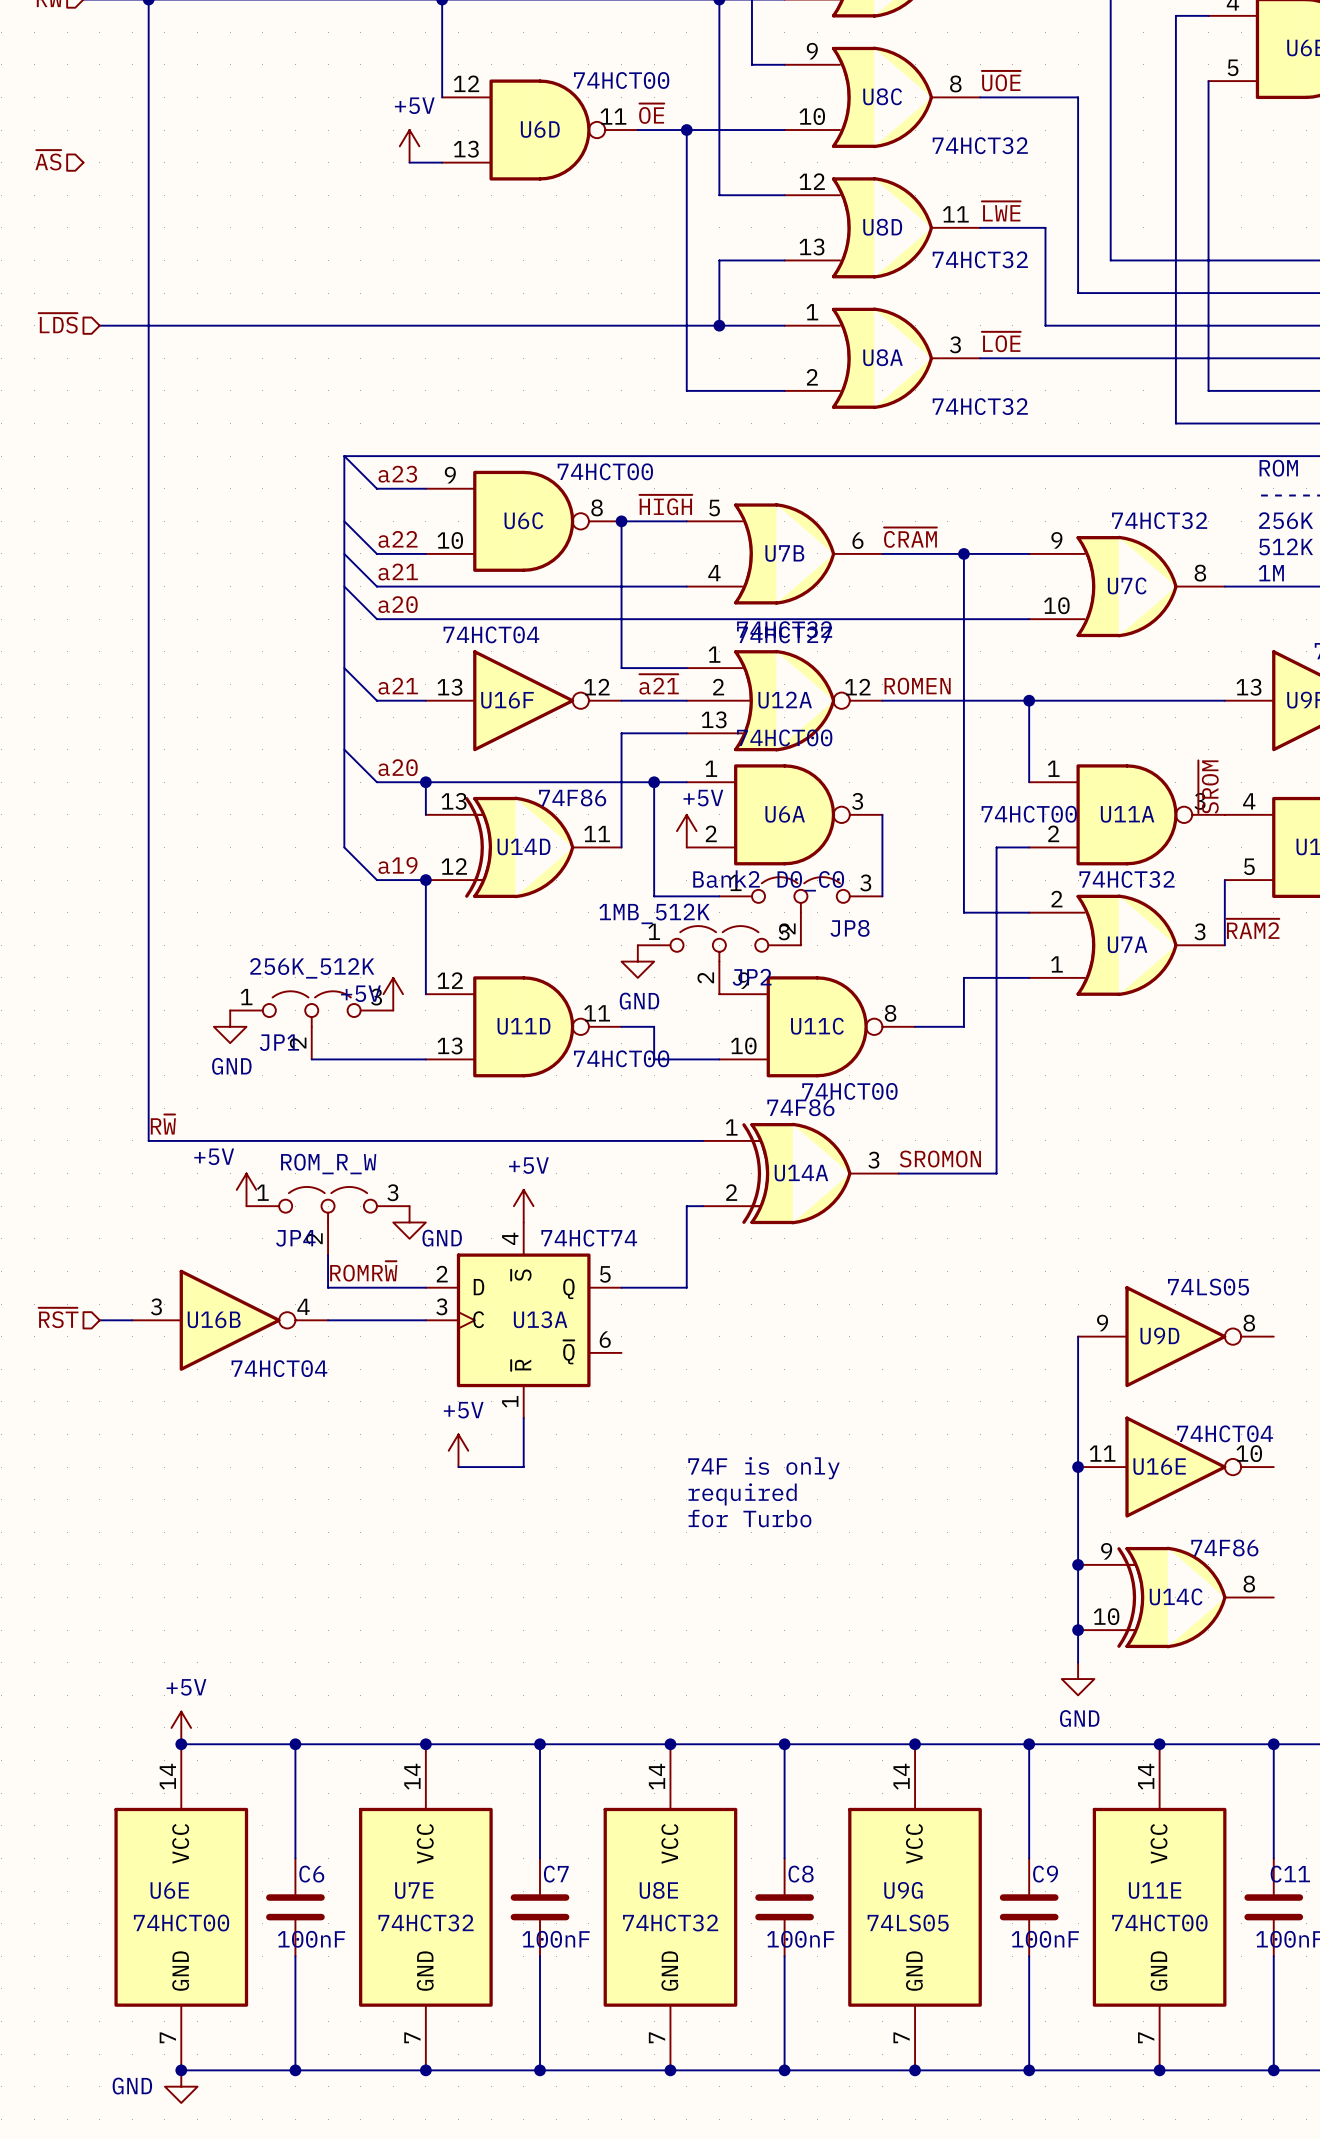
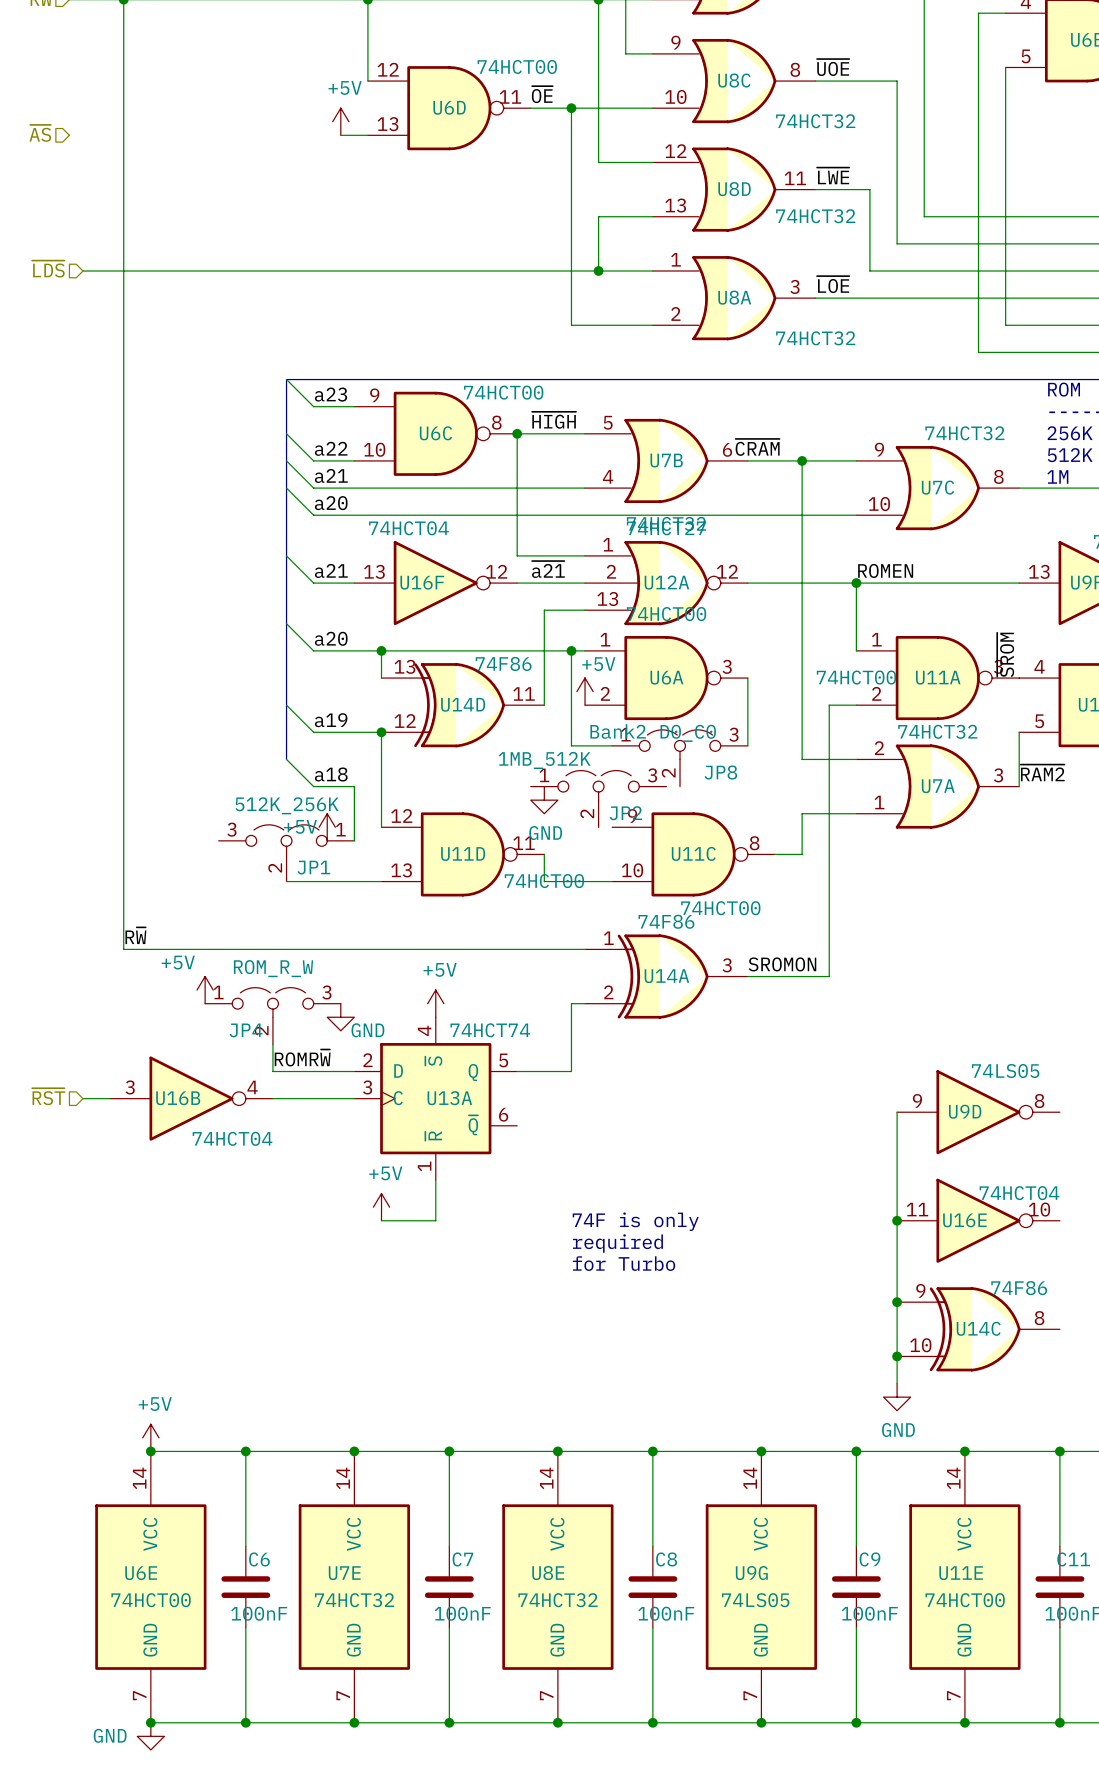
U7B position: (784, 553) -> (666, 460)
label position: ROMEN (917, 686) -> ROMEN (885, 570)
U12A position: (784, 700) -> (666, 583)
wire: (654, 733) (621, 733) (621, 847) -> (544, 610) (544, 650)
wire: (425, 782) (425, 814) -> (381, 650) (381, 678)
junction position: (425, 782) -> (381, 650)
junction position: (654, 782) -> (571, 650)
U6A position: (784, 814) -> (666, 678)
wire: (882, 814) (882, 896) -> (747, 678) (747, 745)
power symbol position: +5V (686, 831) -> +5V (585, 691)
bus: none -> (286, 705) (286, 759)
U14D position: (523, 847) -> (462, 705)
wire: (654, 847) (654, 896) (686, 896) -> (585, 650) (571, 650) (571, 745)
wire: (425, 880) (425, 945) -> (354, 732) (381, 732) (381, 827)
junction position: (425, 880) -> (381, 732)
JP8 position: (800, 911) -> (680, 758)
wire: none -> (286, 759) (313, 786) (354, 786)
label: none -> a18 (331, 774)
power symbol position: GND (637, 961) -> GND (544, 800)
JP1 value: 256K_512K (312, 968) -> 512K_256K (287, 805)
wire: none -> (354, 827) (354, 840)
JP1 flip: as is (311, 1009) -> left-right (286, 839)
power symbol: GND (230, 1026) -> none
U11D position: (523, 1026) -> (462, 854)
U11C position: (817, 1026) -> (693, 854)
wire: (311, 1059) (344, 1059) -> none

